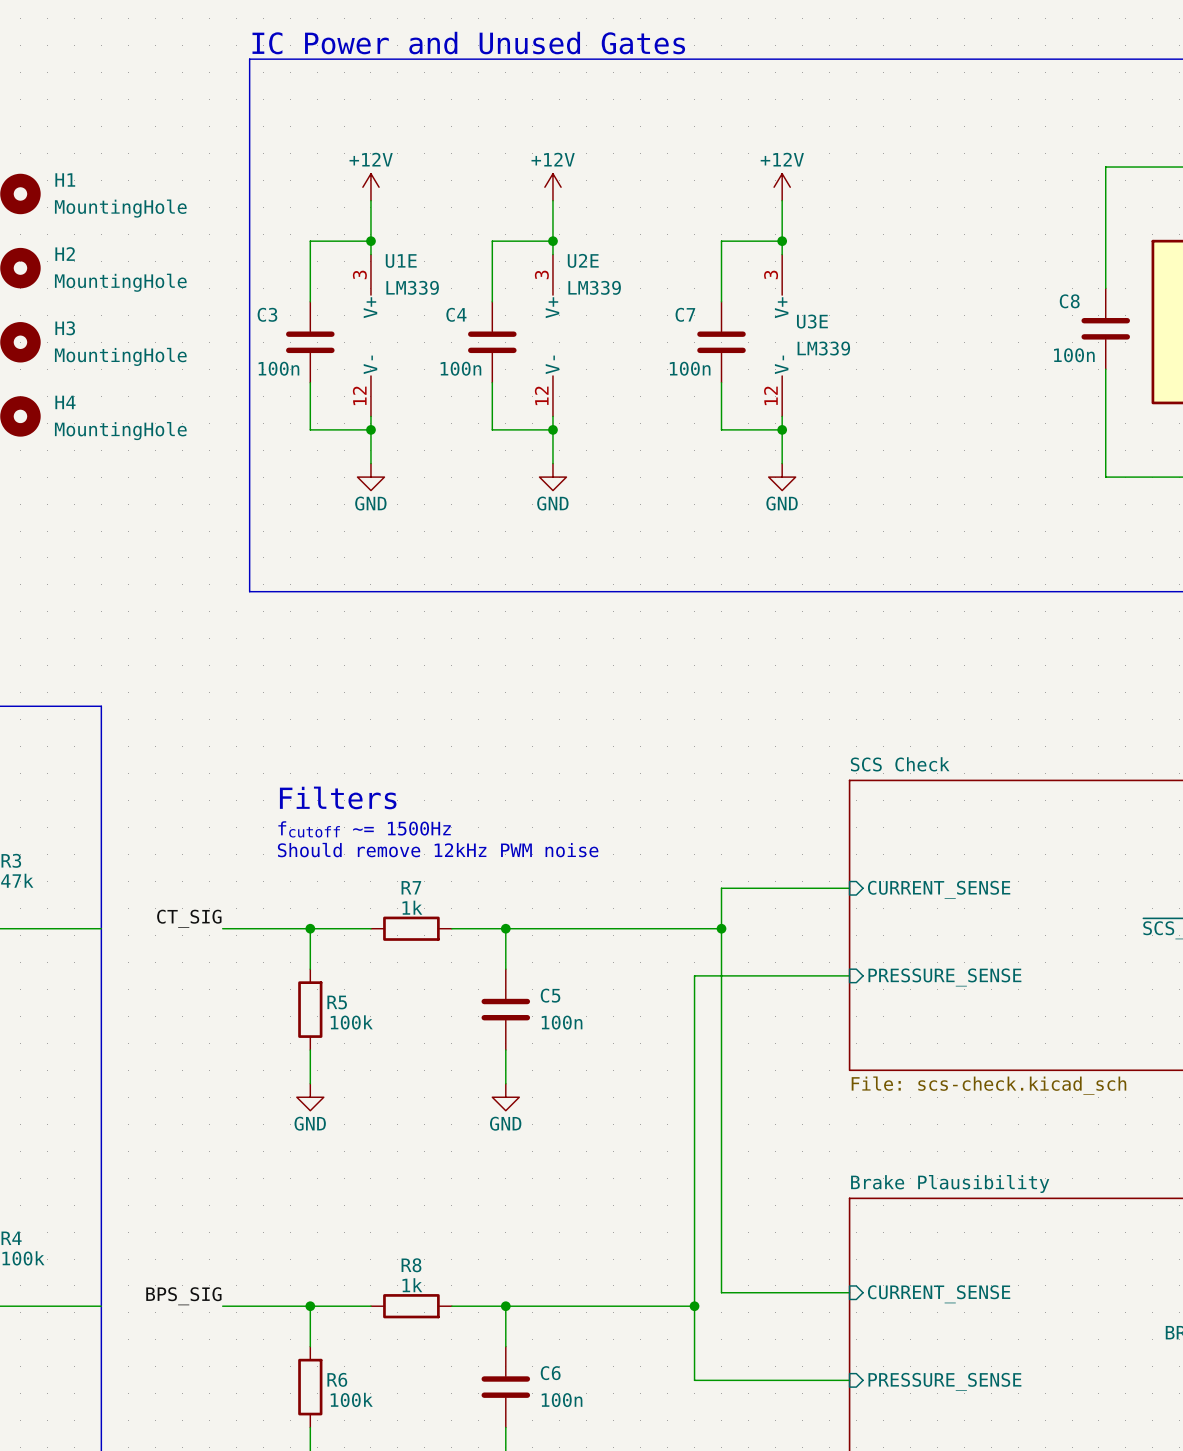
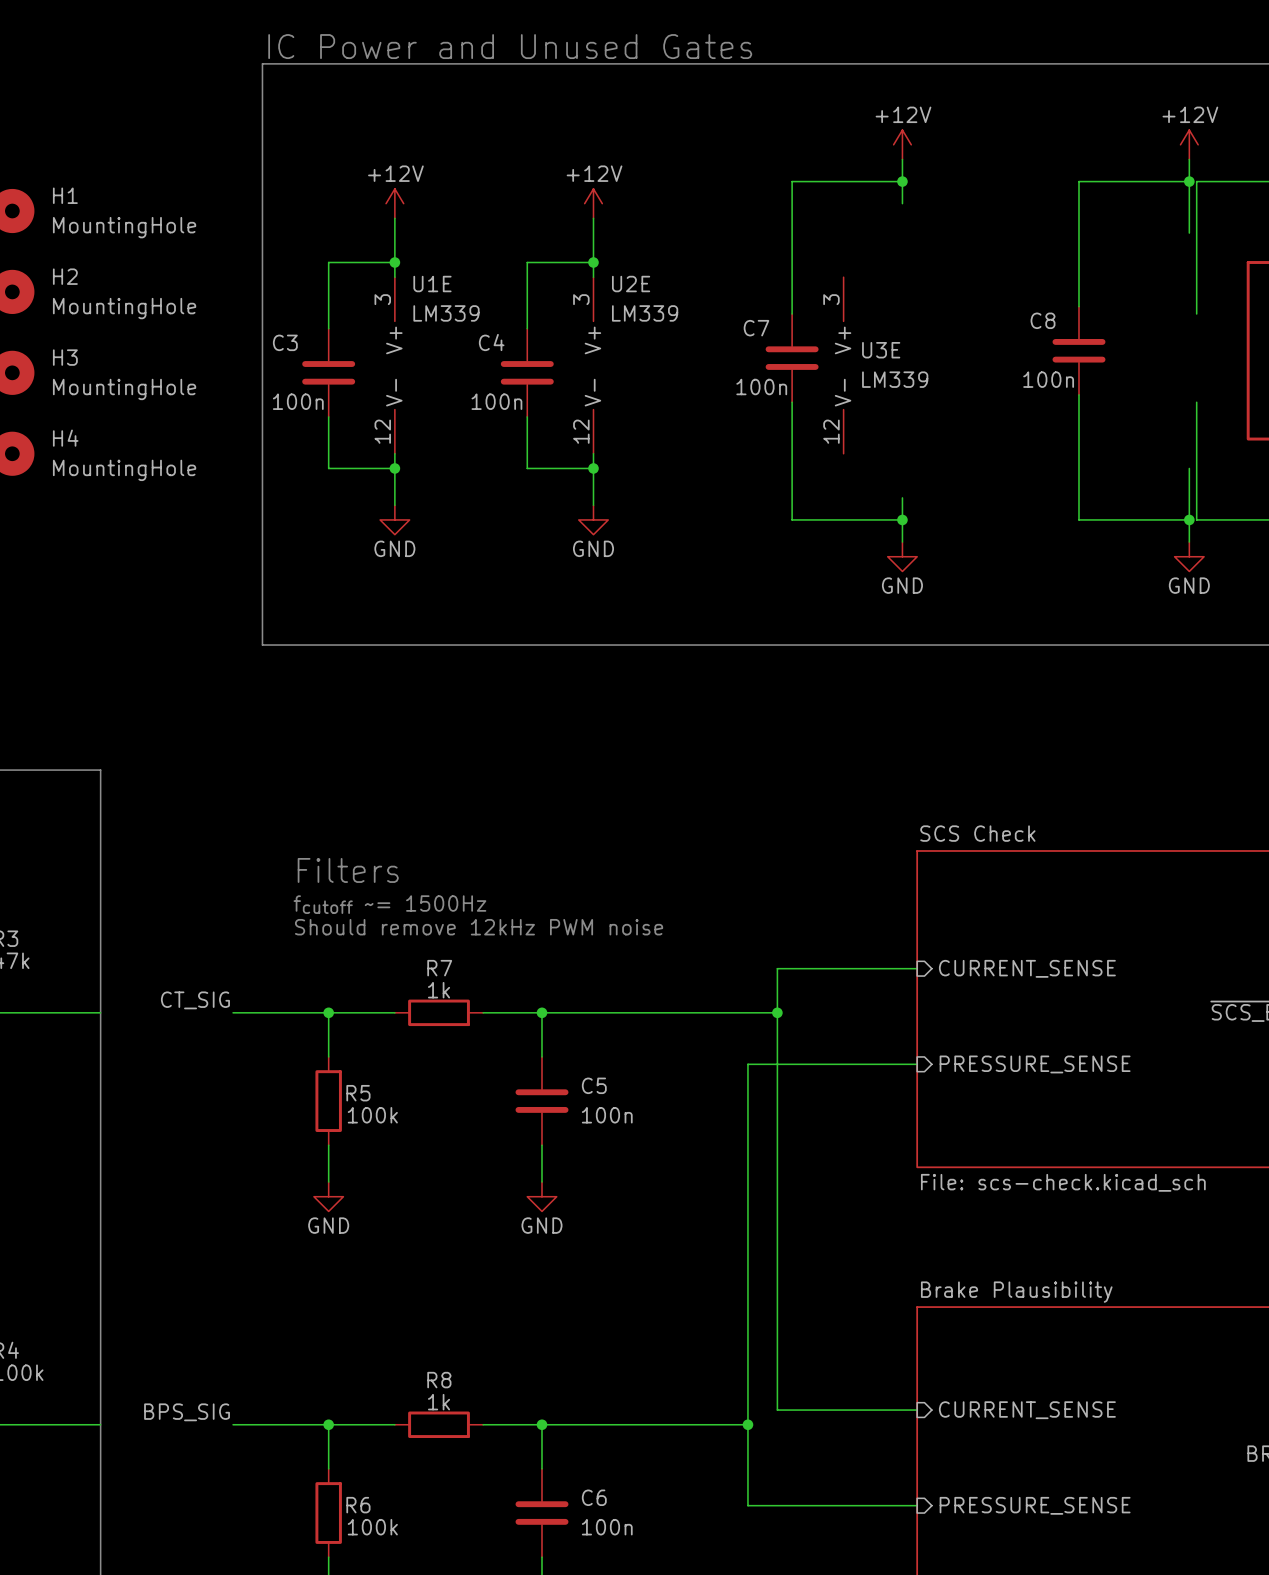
power symbol: none -> +12V (1189, 144)
wire: none -> (902, 159) (902, 203)
wire: none -> (1189, 159) (1189, 233)
wire: none -> (902, 181) (792, 181) (792, 313)
junction: none -> (902, 181)
wire: none -> (1189, 181) (1078, 181) (1078, 306)
junction: none -> (1189, 181)
power symbol position: +12V (782, 187) -> +12V (902, 144)
wire: (782, 200) (782, 254) -> none
wire: (782, 241) (721, 241) (721, 301) -> none
junction: (782, 241) -> none
C8 position: (1105, 328) -> (1078, 350)
C7 position: (721, 342) -> (792, 358)
wire: none -> (1078, 394) (1078, 519) (1189, 519)
wire: none -> (792, 402) (792, 519) (902, 519)
wire: (721, 382) (721, 429) (782, 429) -> none
wire: (782, 416) (782, 463) -> none
junction: (782, 429) -> none
wire: none -> (1189, 468) (1189, 542)
wire: none -> (902, 497) (902, 542)
power symbol position: GND (782, 477) -> GND (902, 556)
junction: none -> (902, 519)
junction: none -> (1189, 519)
power symbol: none -> GND (1189, 556)

